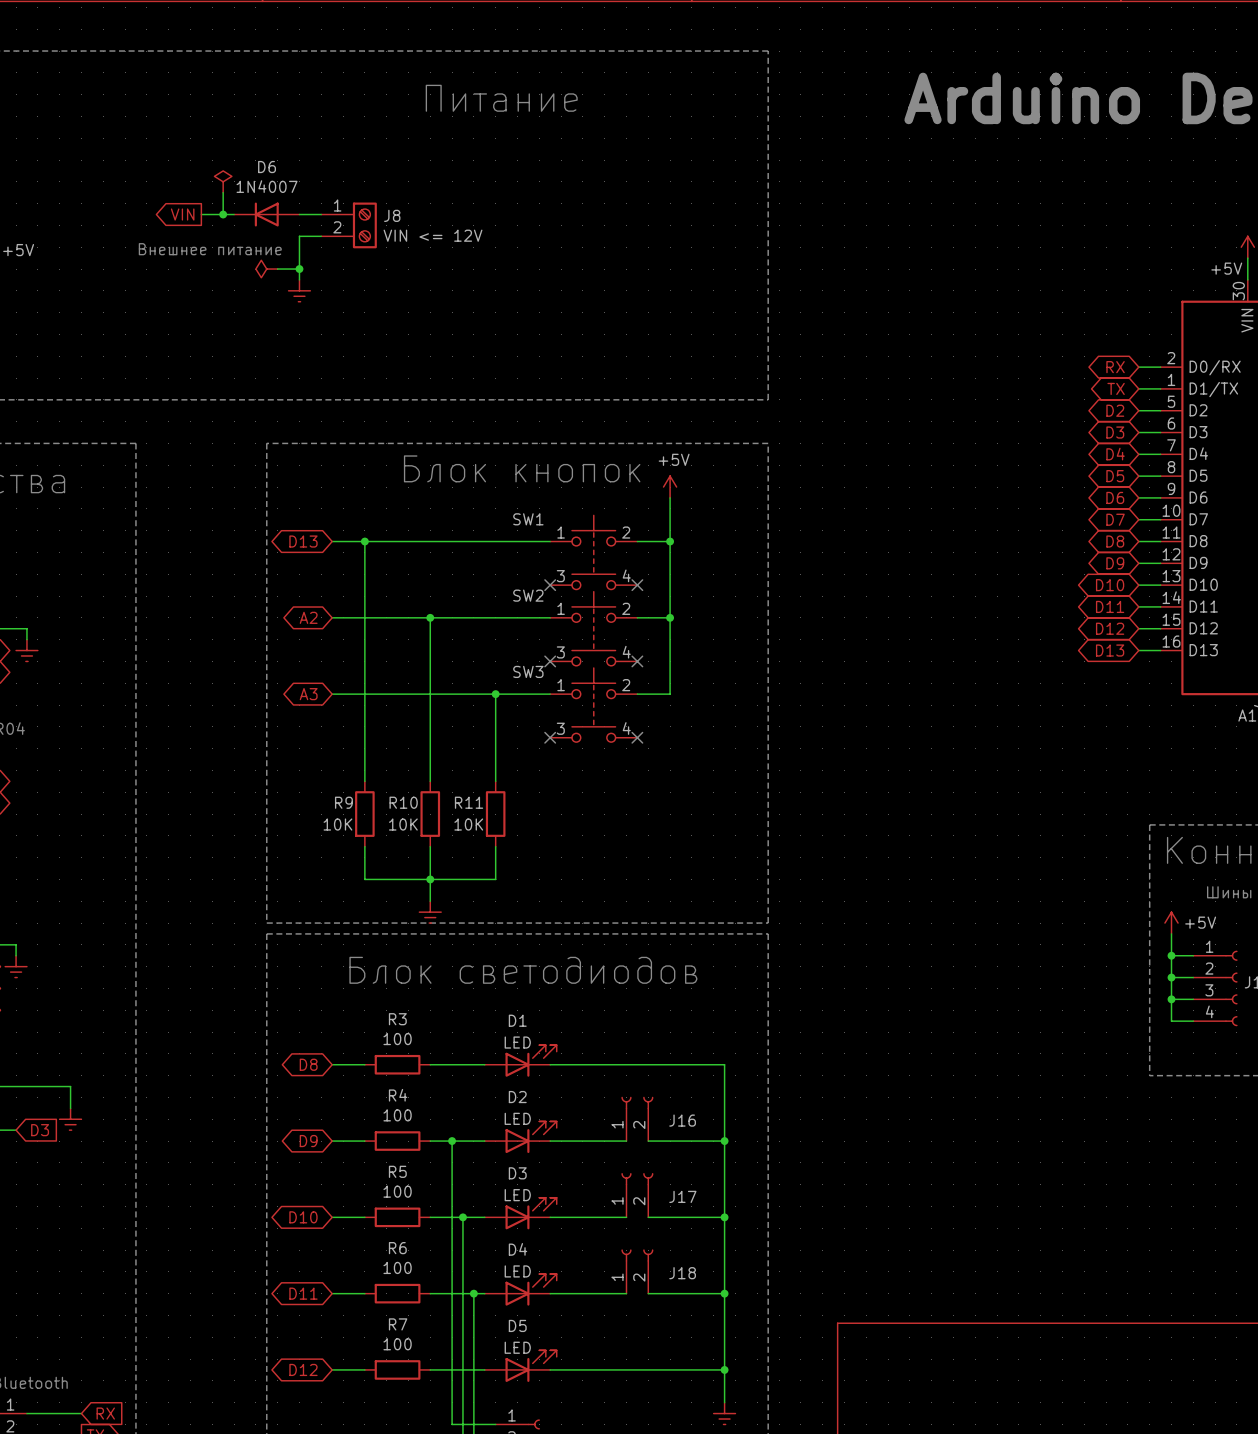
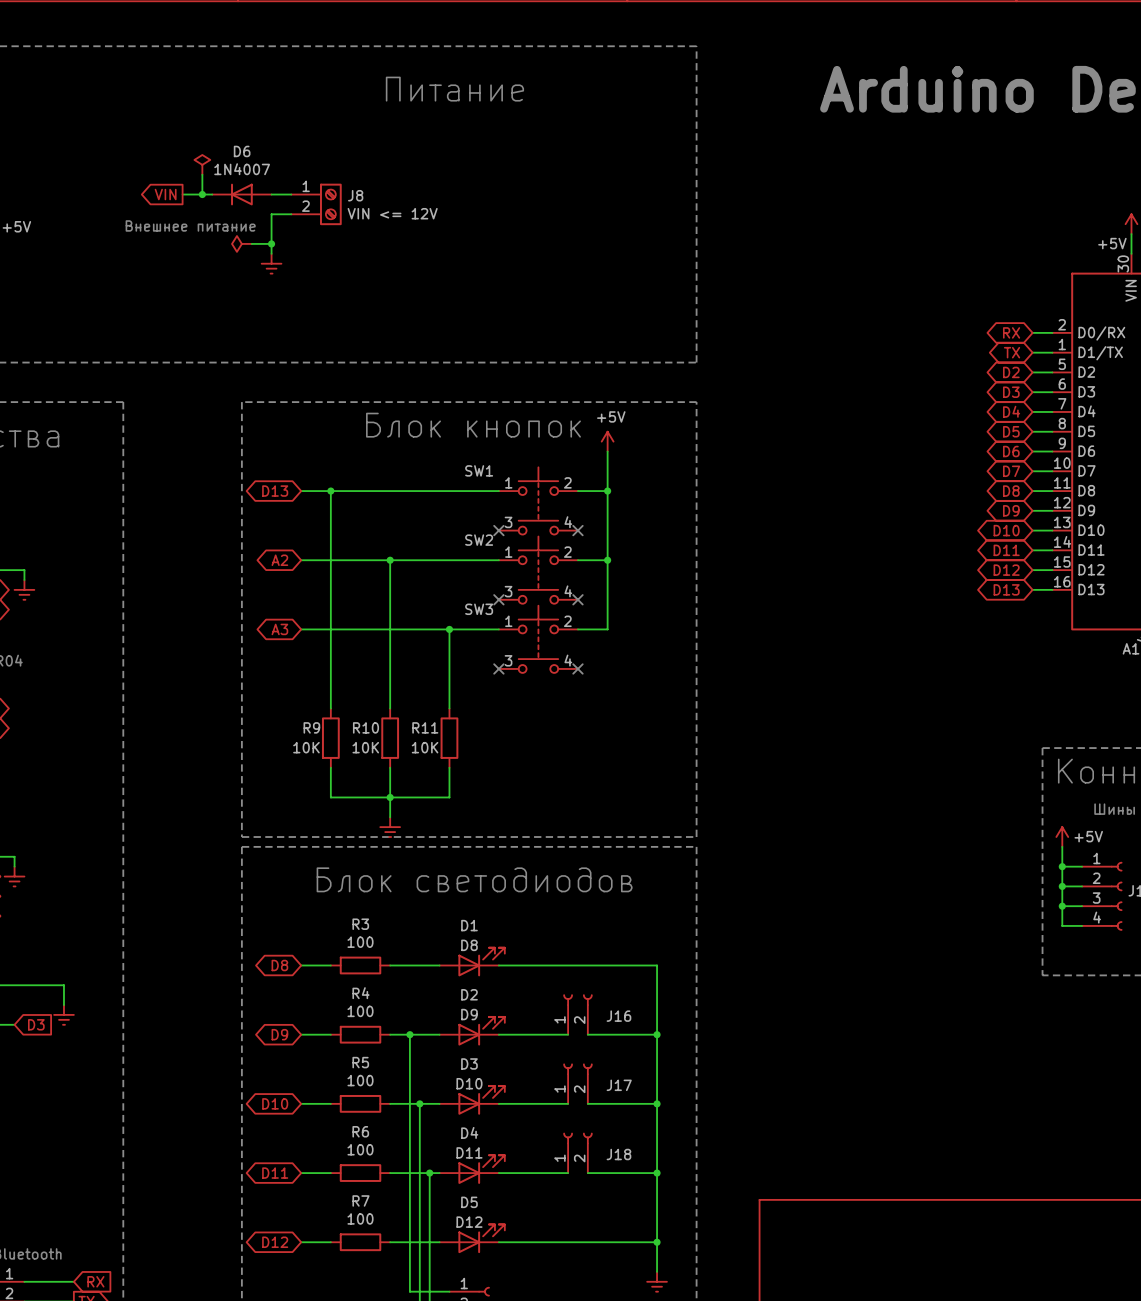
D1 value: LED (517, 1042) -> D8 (469, 945)
D2 value: LED (517, 1118) -> D9 (469, 1014)
D3 value: LED (517, 1195) -> D10 (469, 1083)
D4 value: LED (517, 1271) -> D11 (469, 1152)
D5 value: LED (517, 1347) -> D12 (469, 1222)

